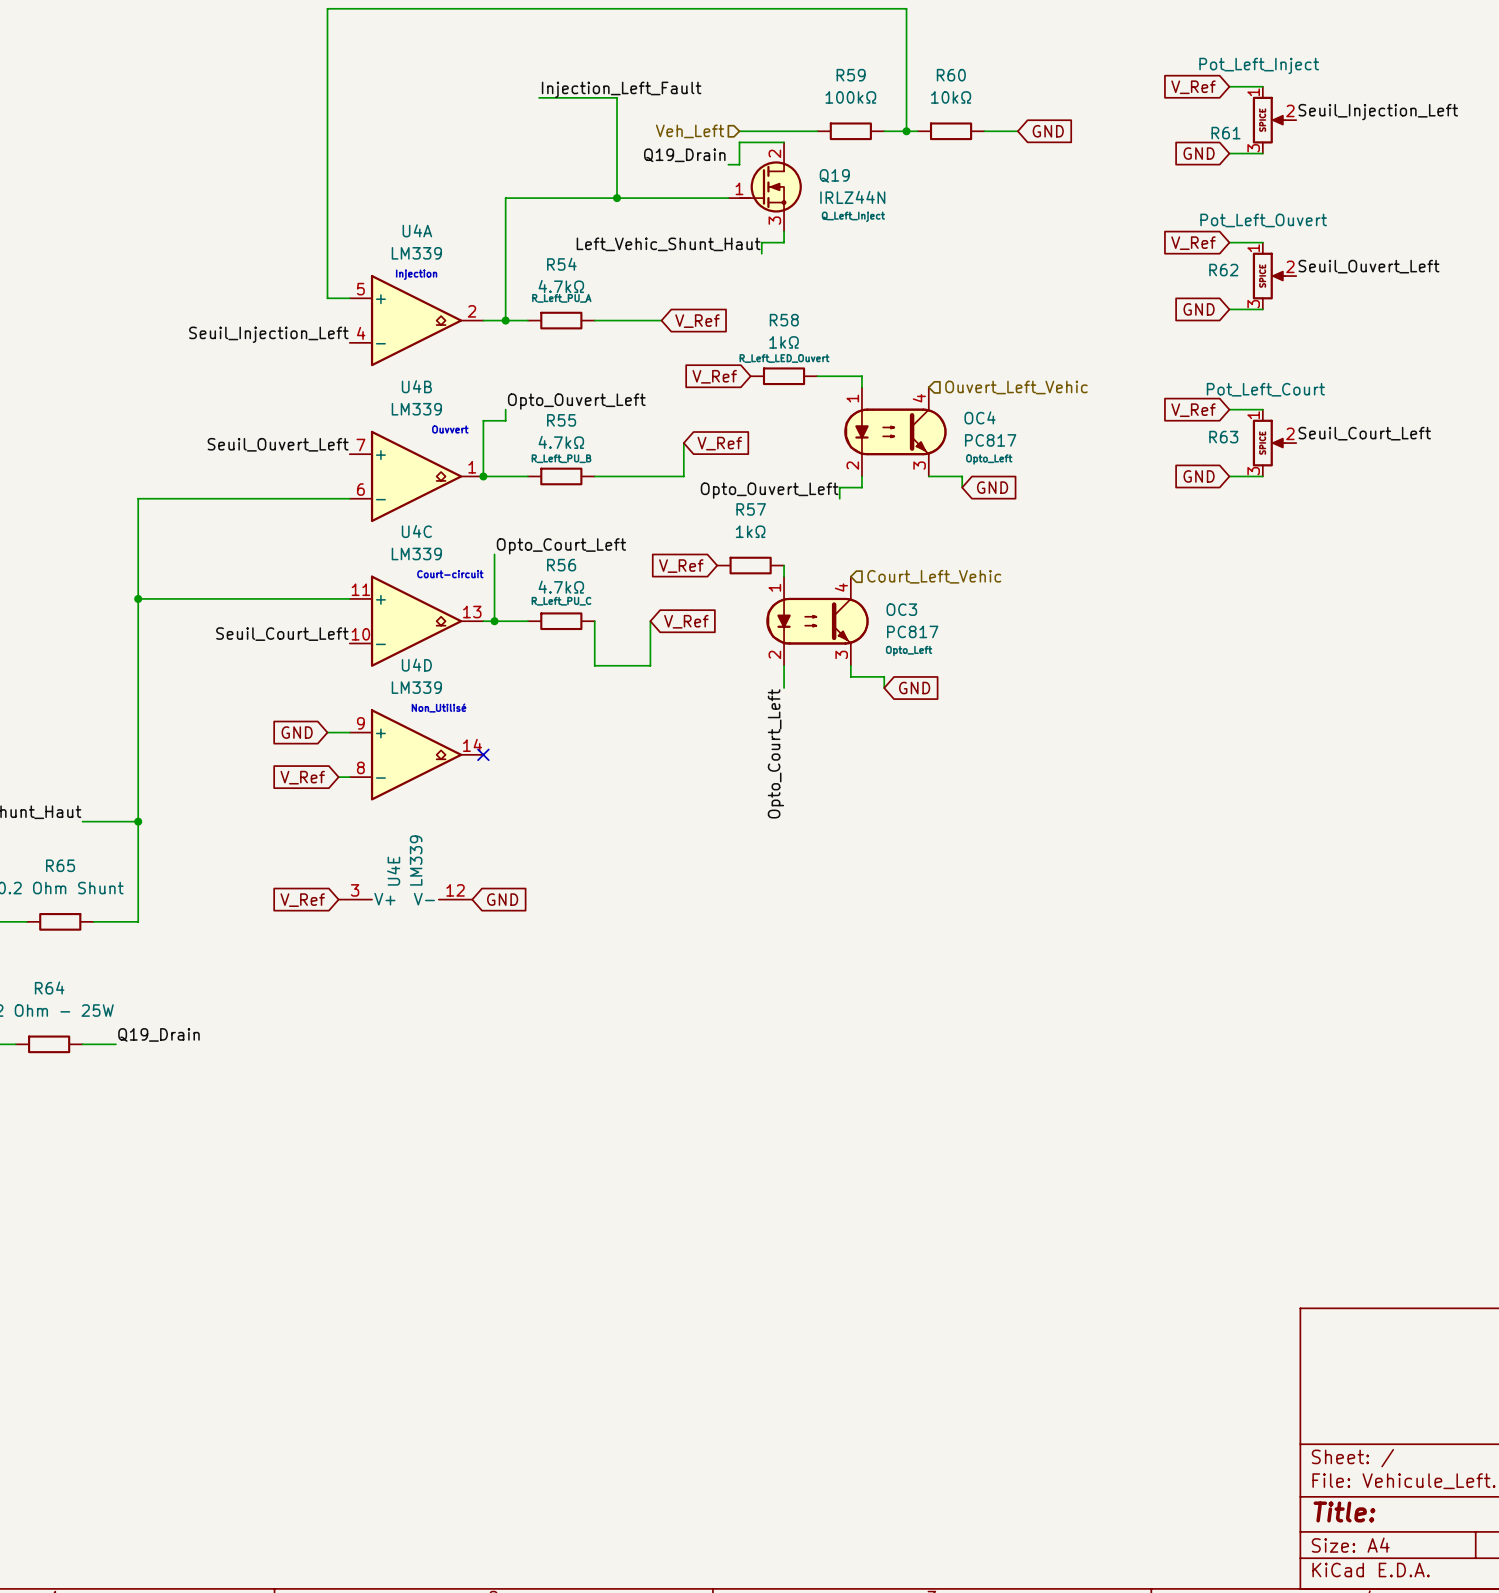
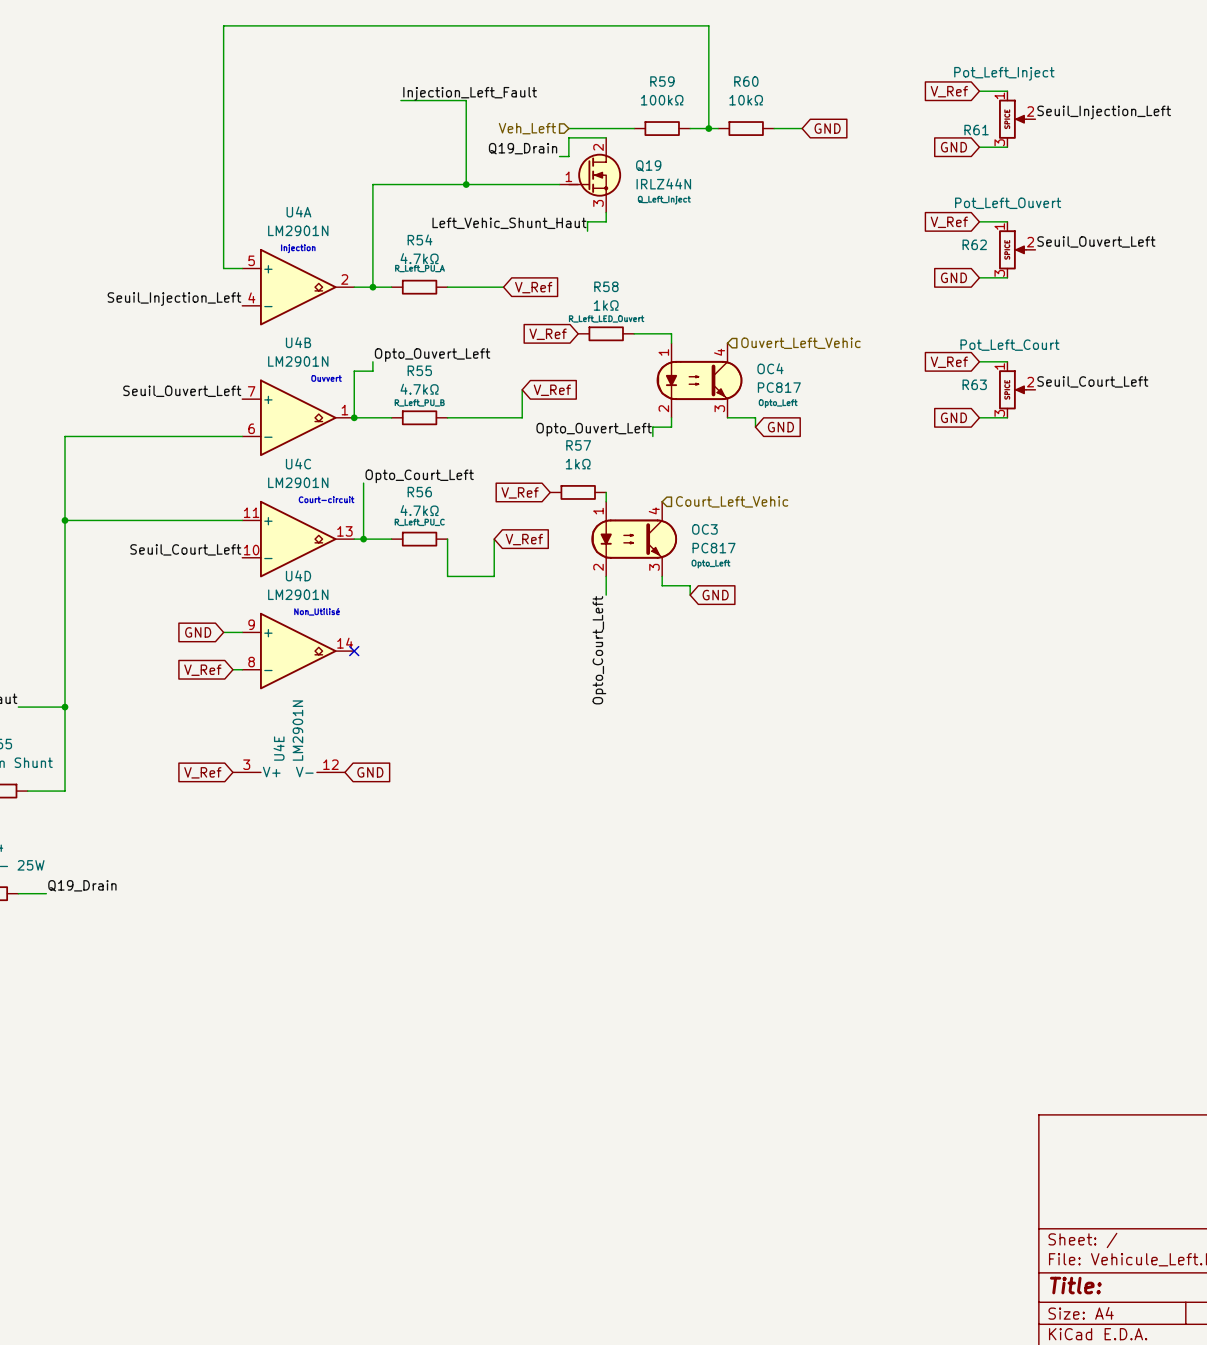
U4A value: LM339 (416, 253) -> LM2901N (298, 230)
U4B value: LM339 (416, 409) -> LM2901N (298, 361)
U4C value: LM339 (416, 553) -> LM2901N (298, 482)
U4D value: LM339 (416, 687) -> LM2901N (298, 594)
U4E value: LM339 (416, 860) -> LM2901N (297, 730)

